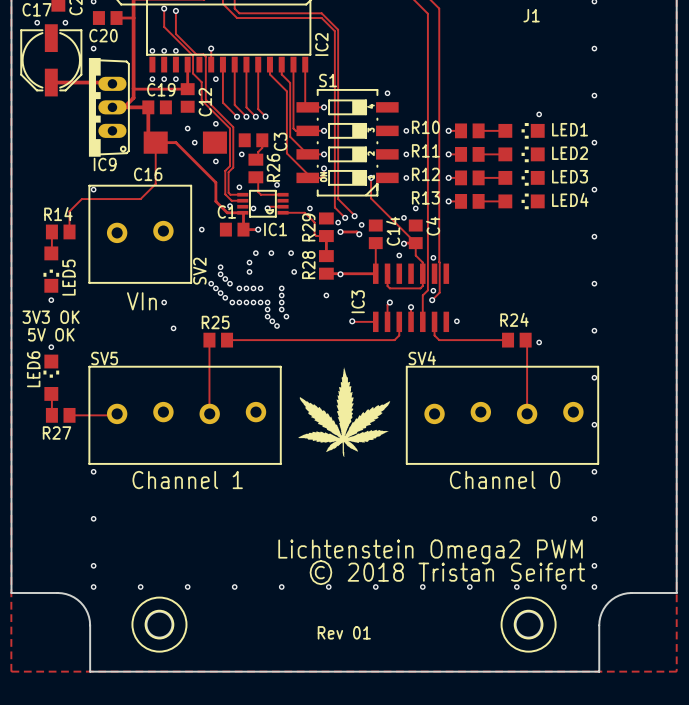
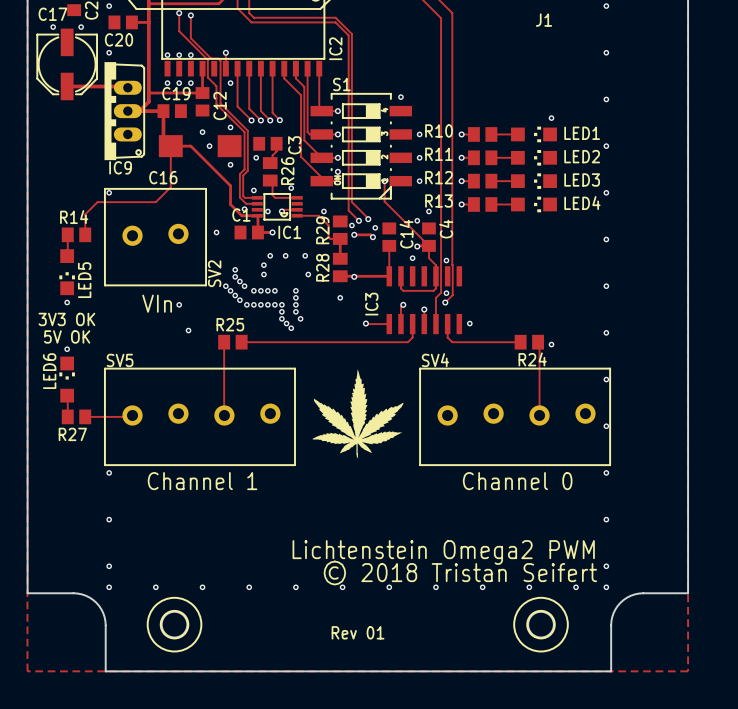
R24 name position: R24 (514, 319) -> R24 (532, 359)

